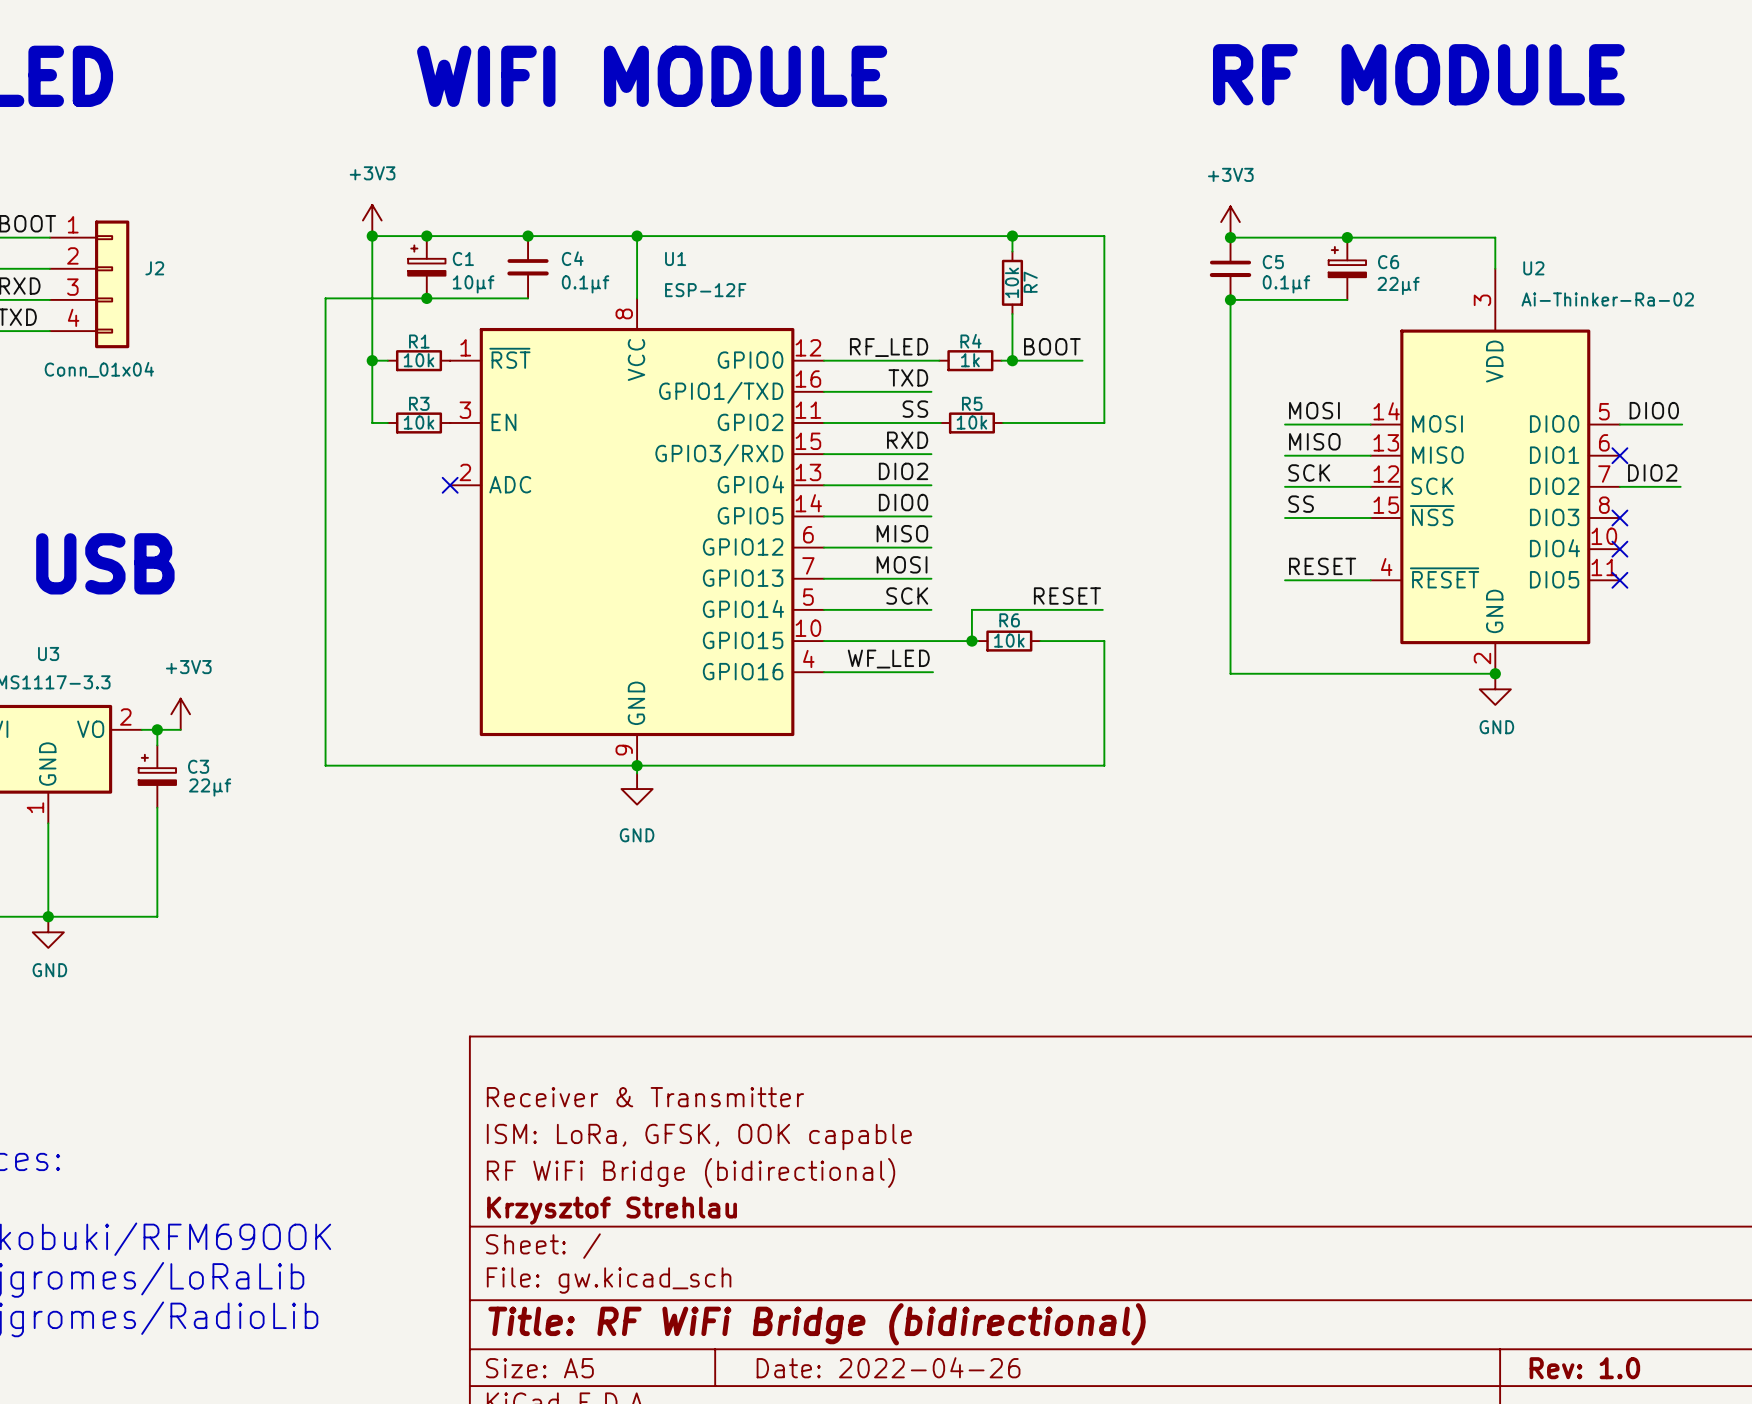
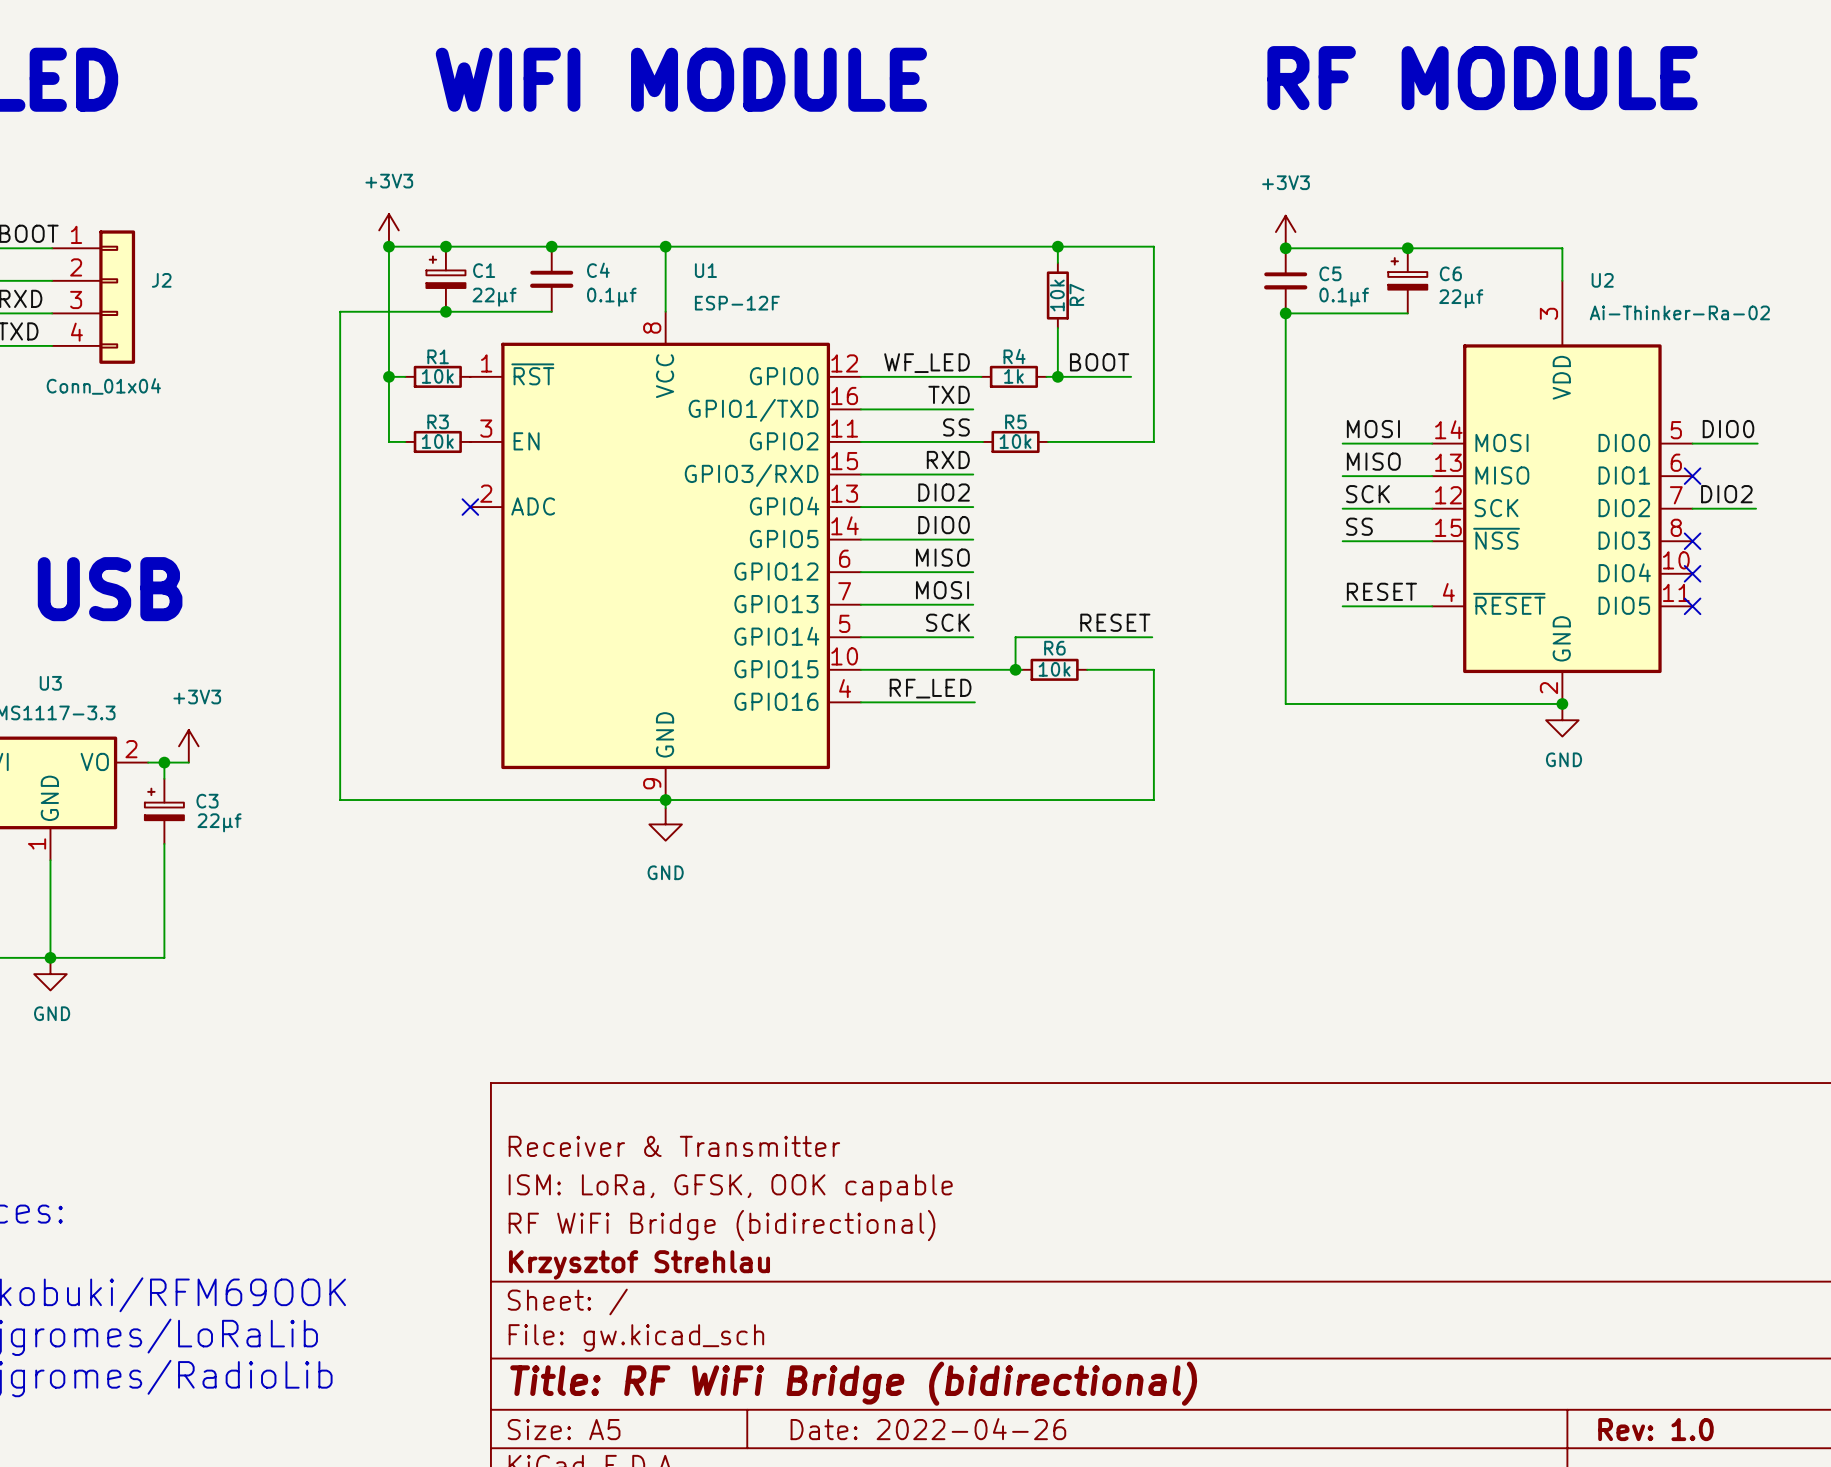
C1 value: 10µf (473, 284) -> 22µf (494, 297)
label: RF_LED (889, 347) -> WF_LED (927, 363)
label: WF_LED (888, 659) -> RF_LED (930, 688)

